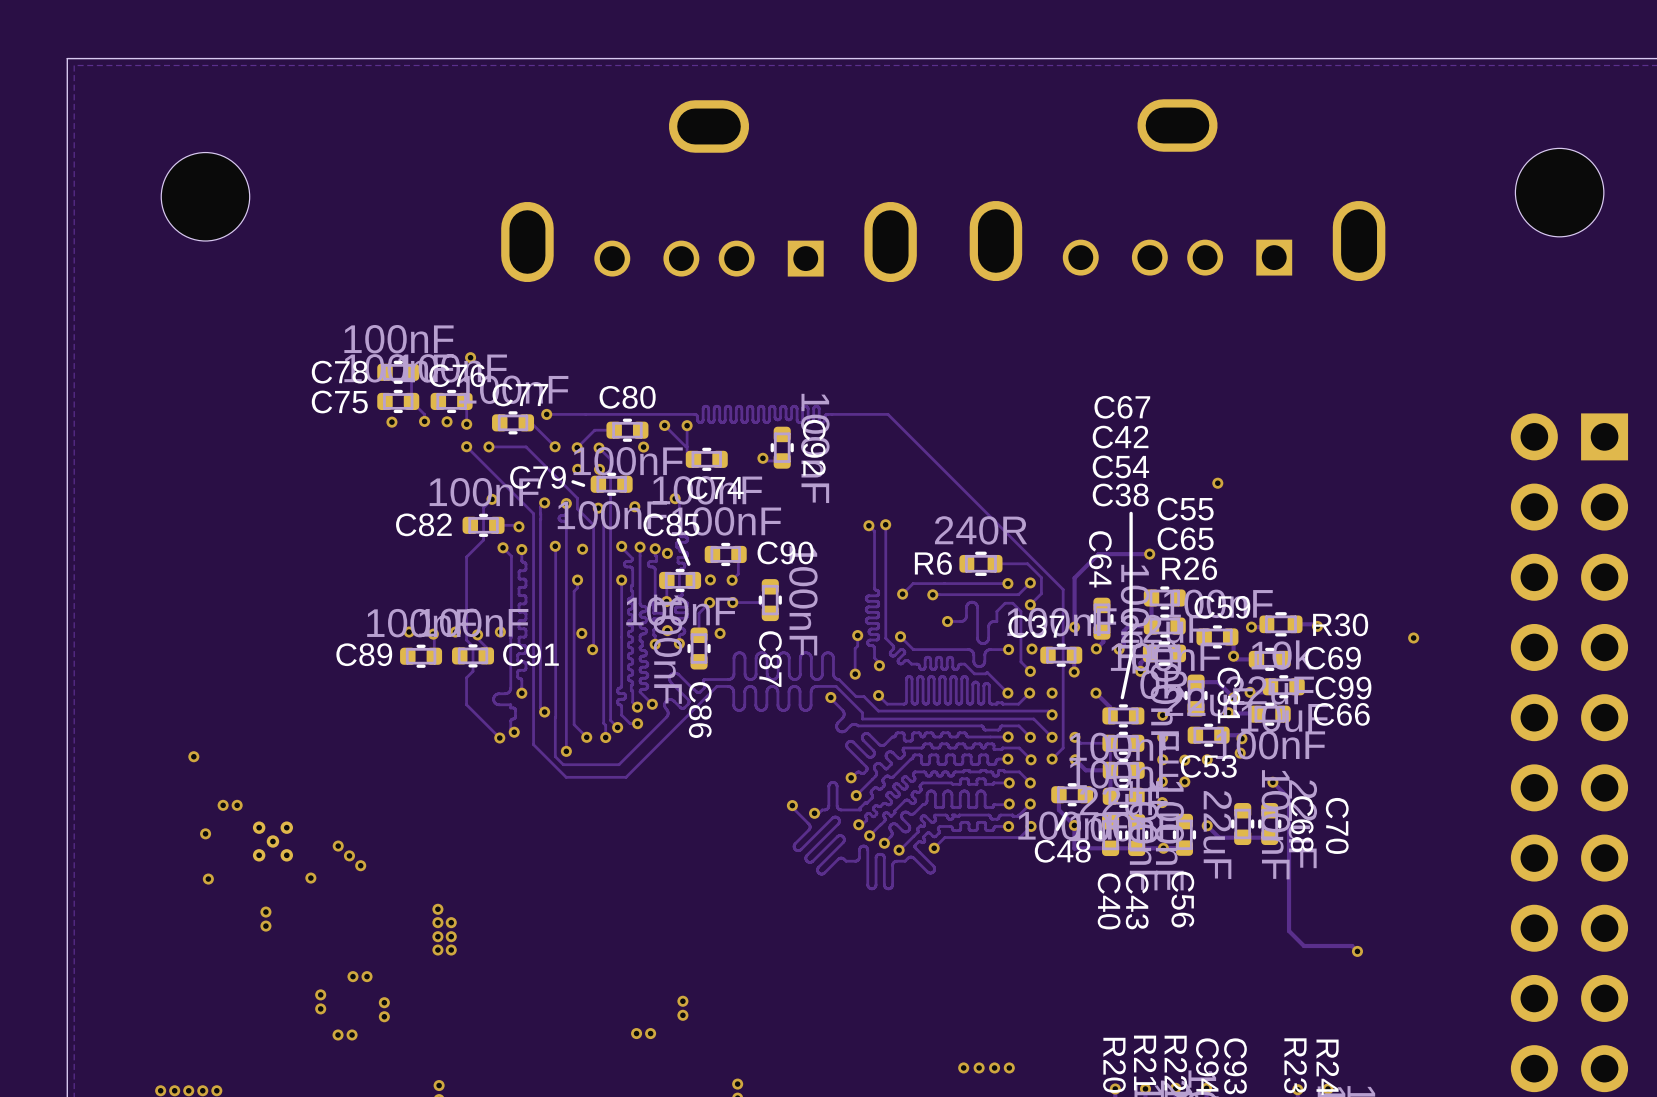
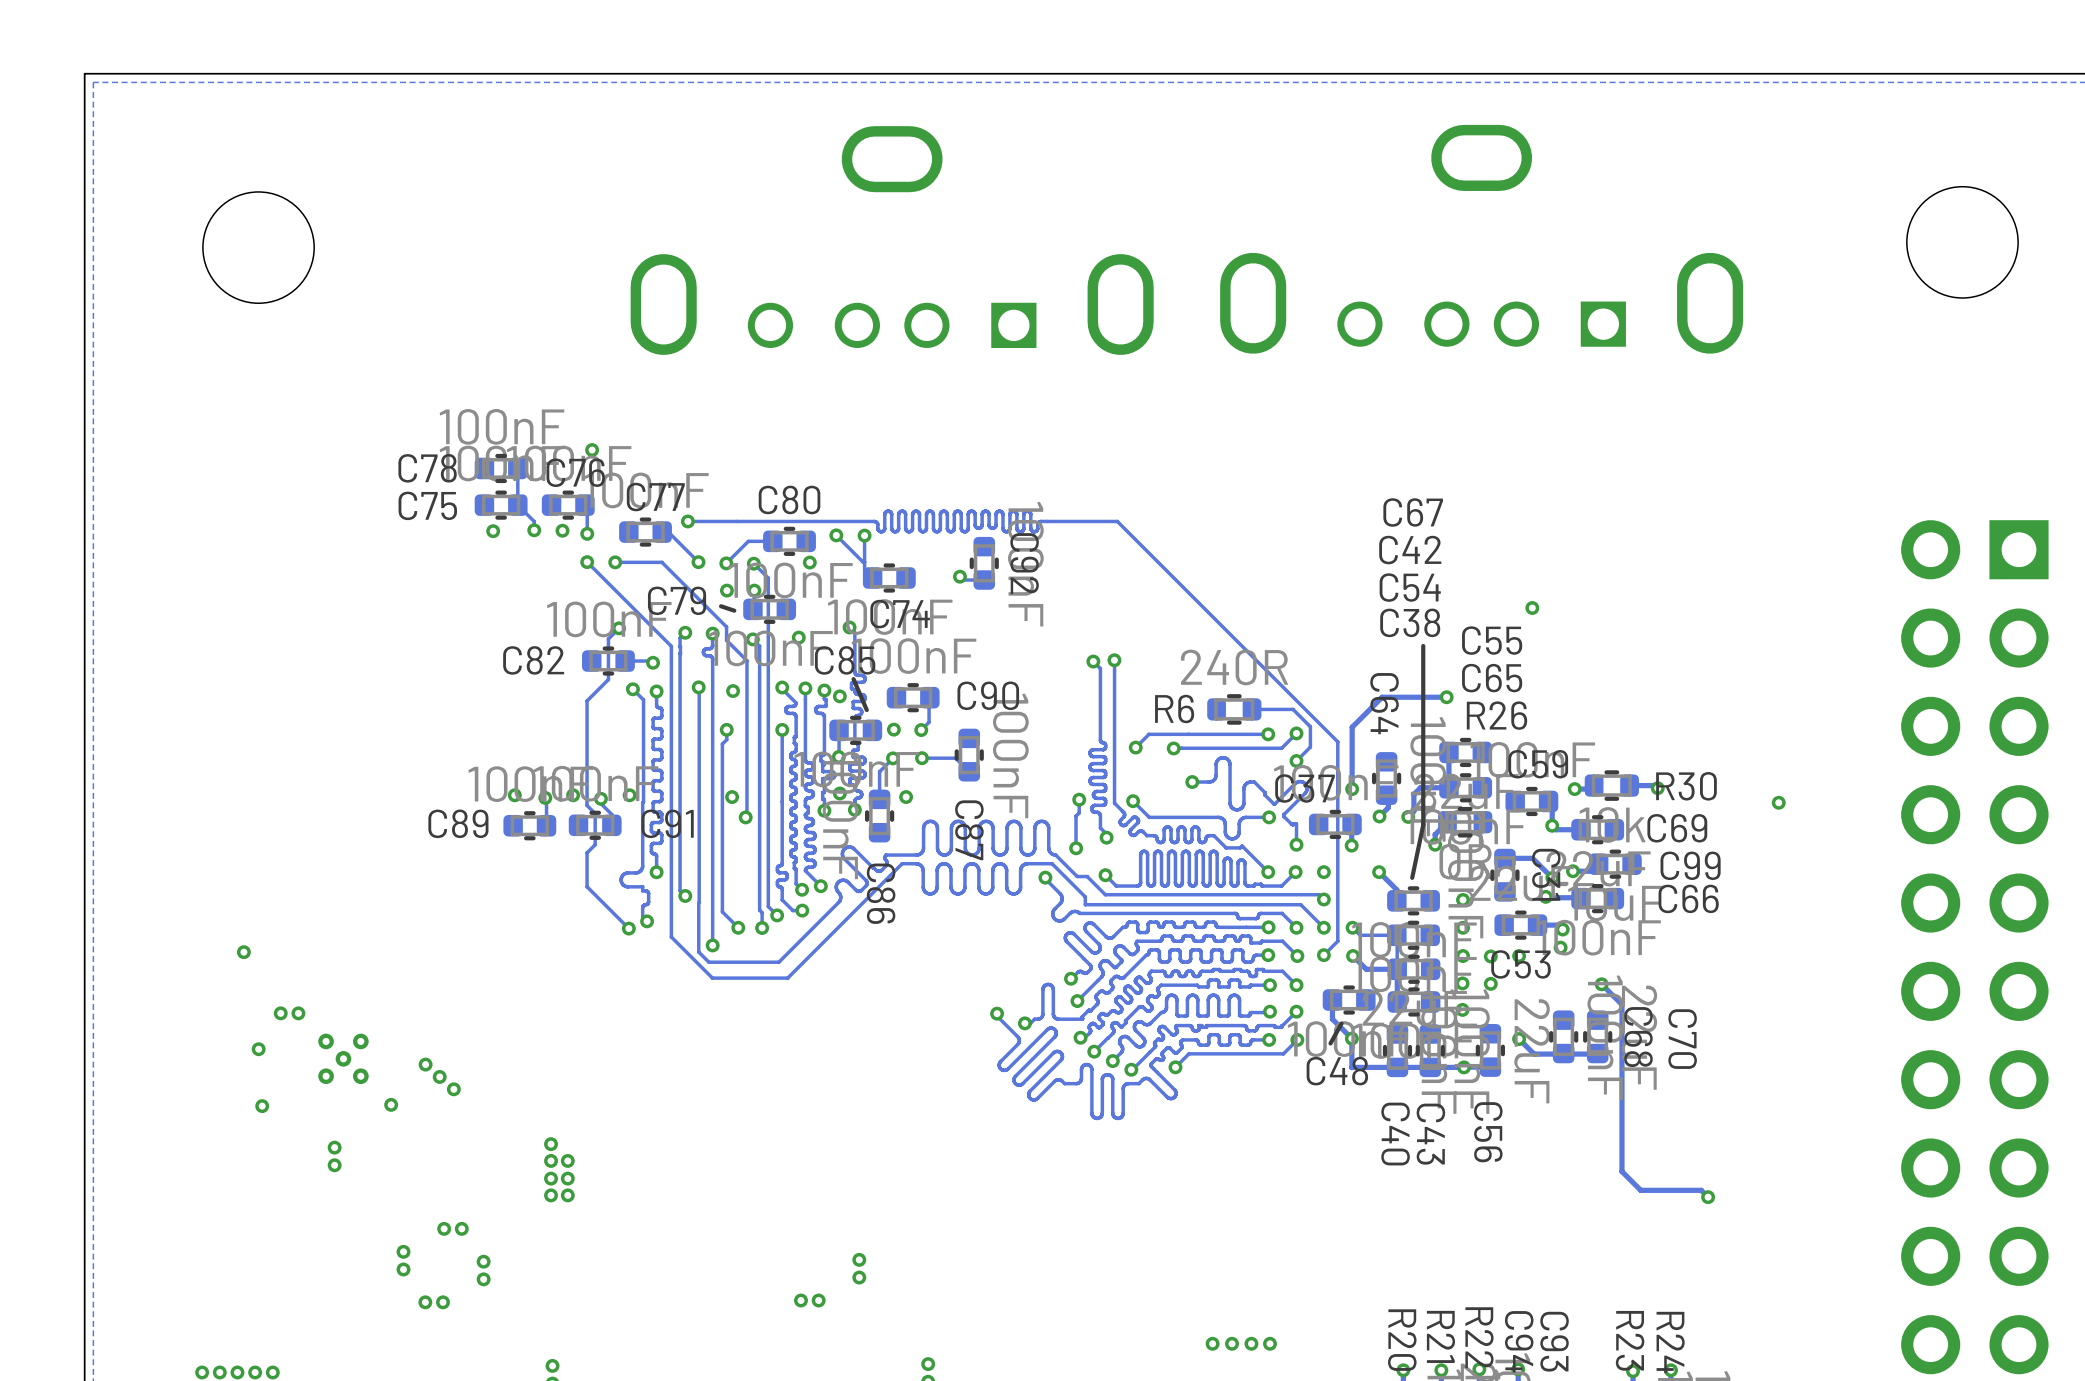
track: (996, 621) (996, 611) (1005, 603) (1012, 603) (1020, 611) (1020, 661) (1030, 671) -> (1296, 824) (1296, 844)
track: none -> (1254, 782) (1265, 792)
track: none -> (1265, 795) (1273, 803)
track: none -> (1274, 803) (1296, 782) (1300, 781) (1305, 783) (1307, 787) (1306, 792) (1284, 814)
track: none -> (1284, 816) (1291, 824)
via: (1031, 649) -> none

